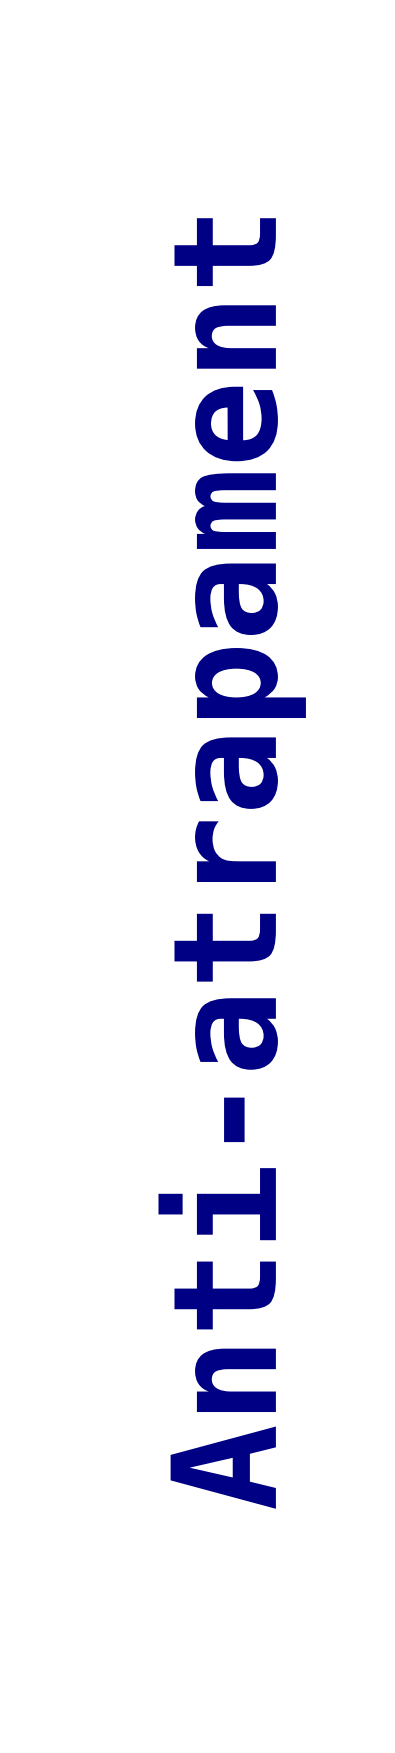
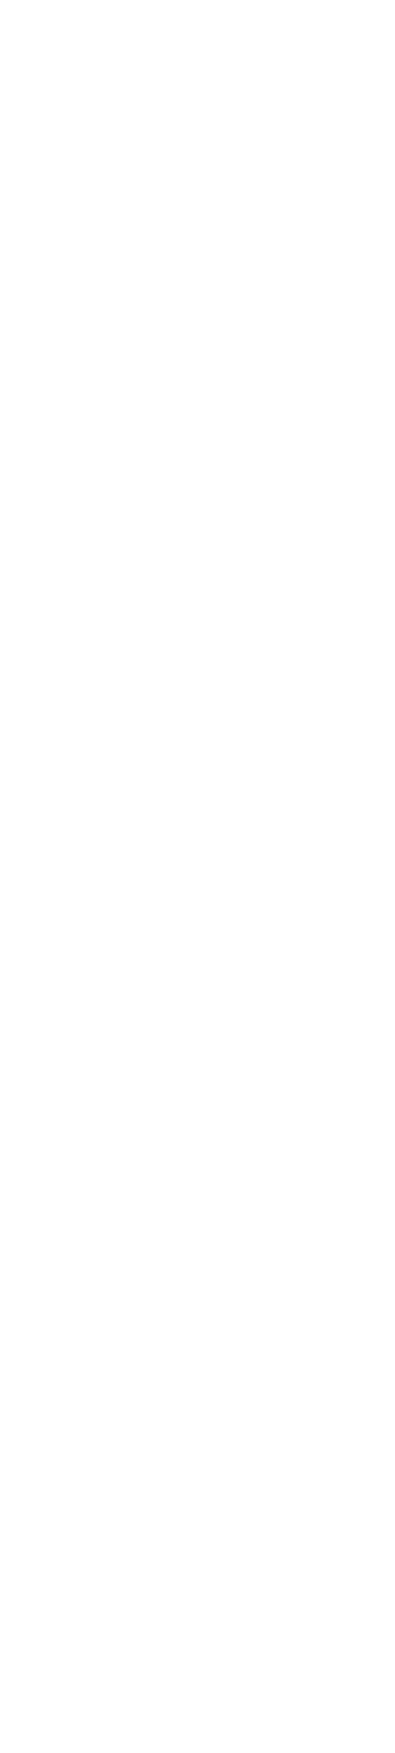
text: Anti-atrapament (232, 863) -> none

